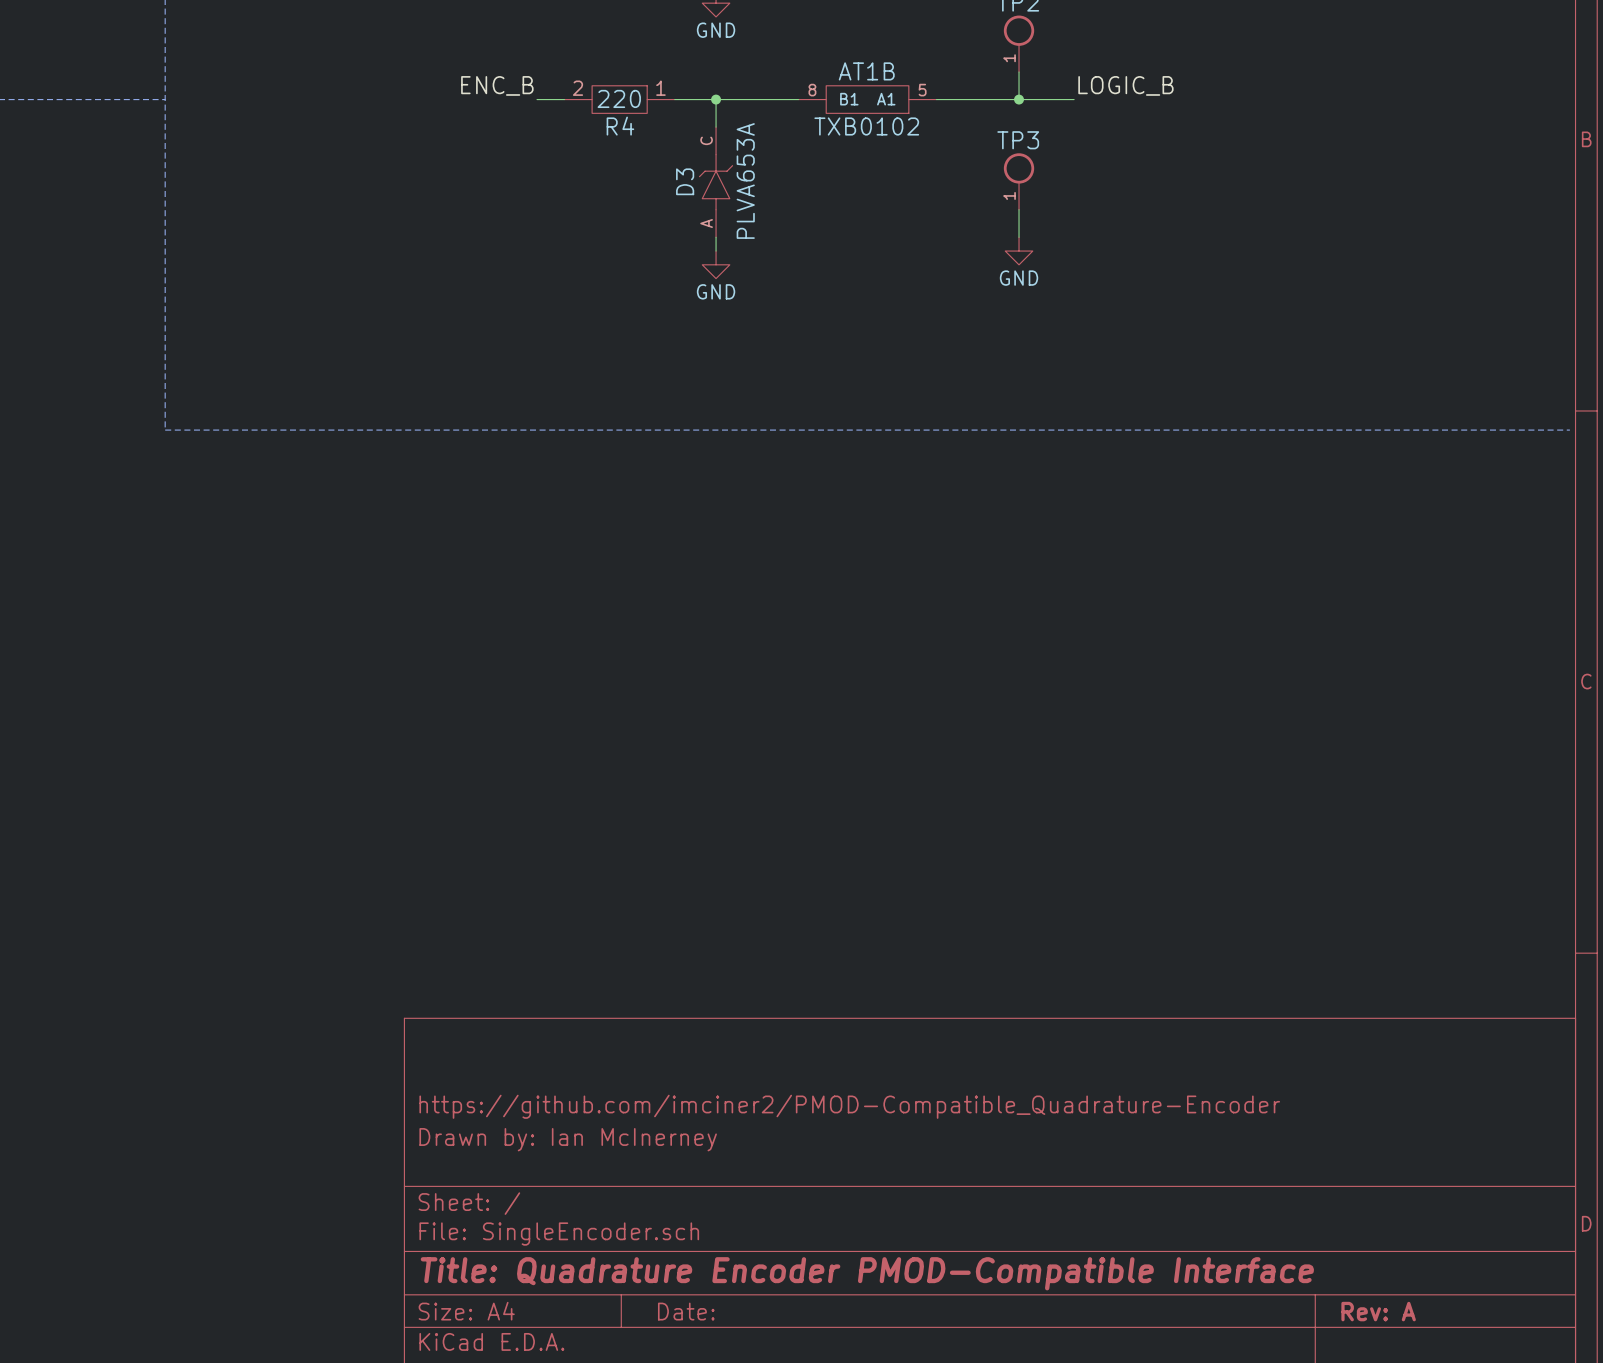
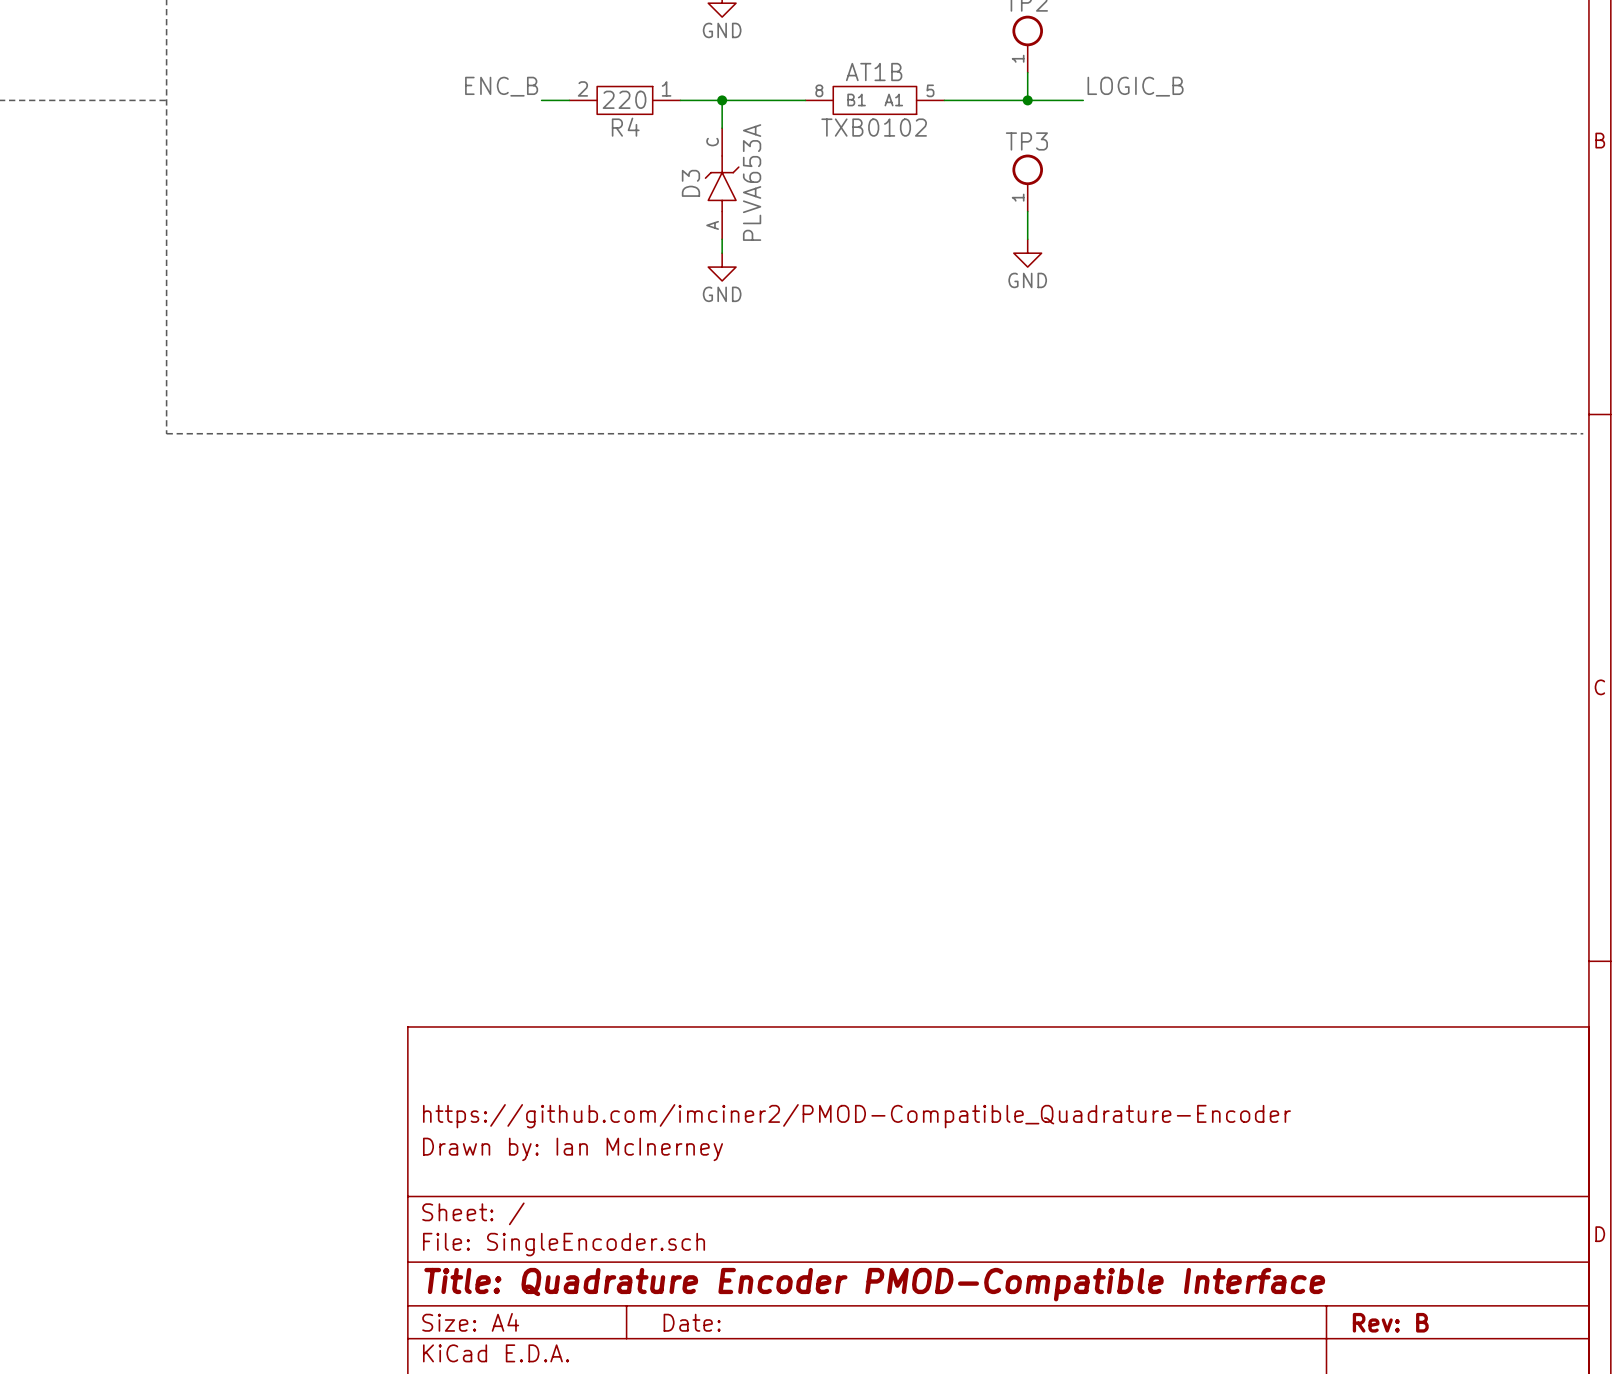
title block: Rev: A (1378, 1311) -> Rev: B (1390, 1322)

